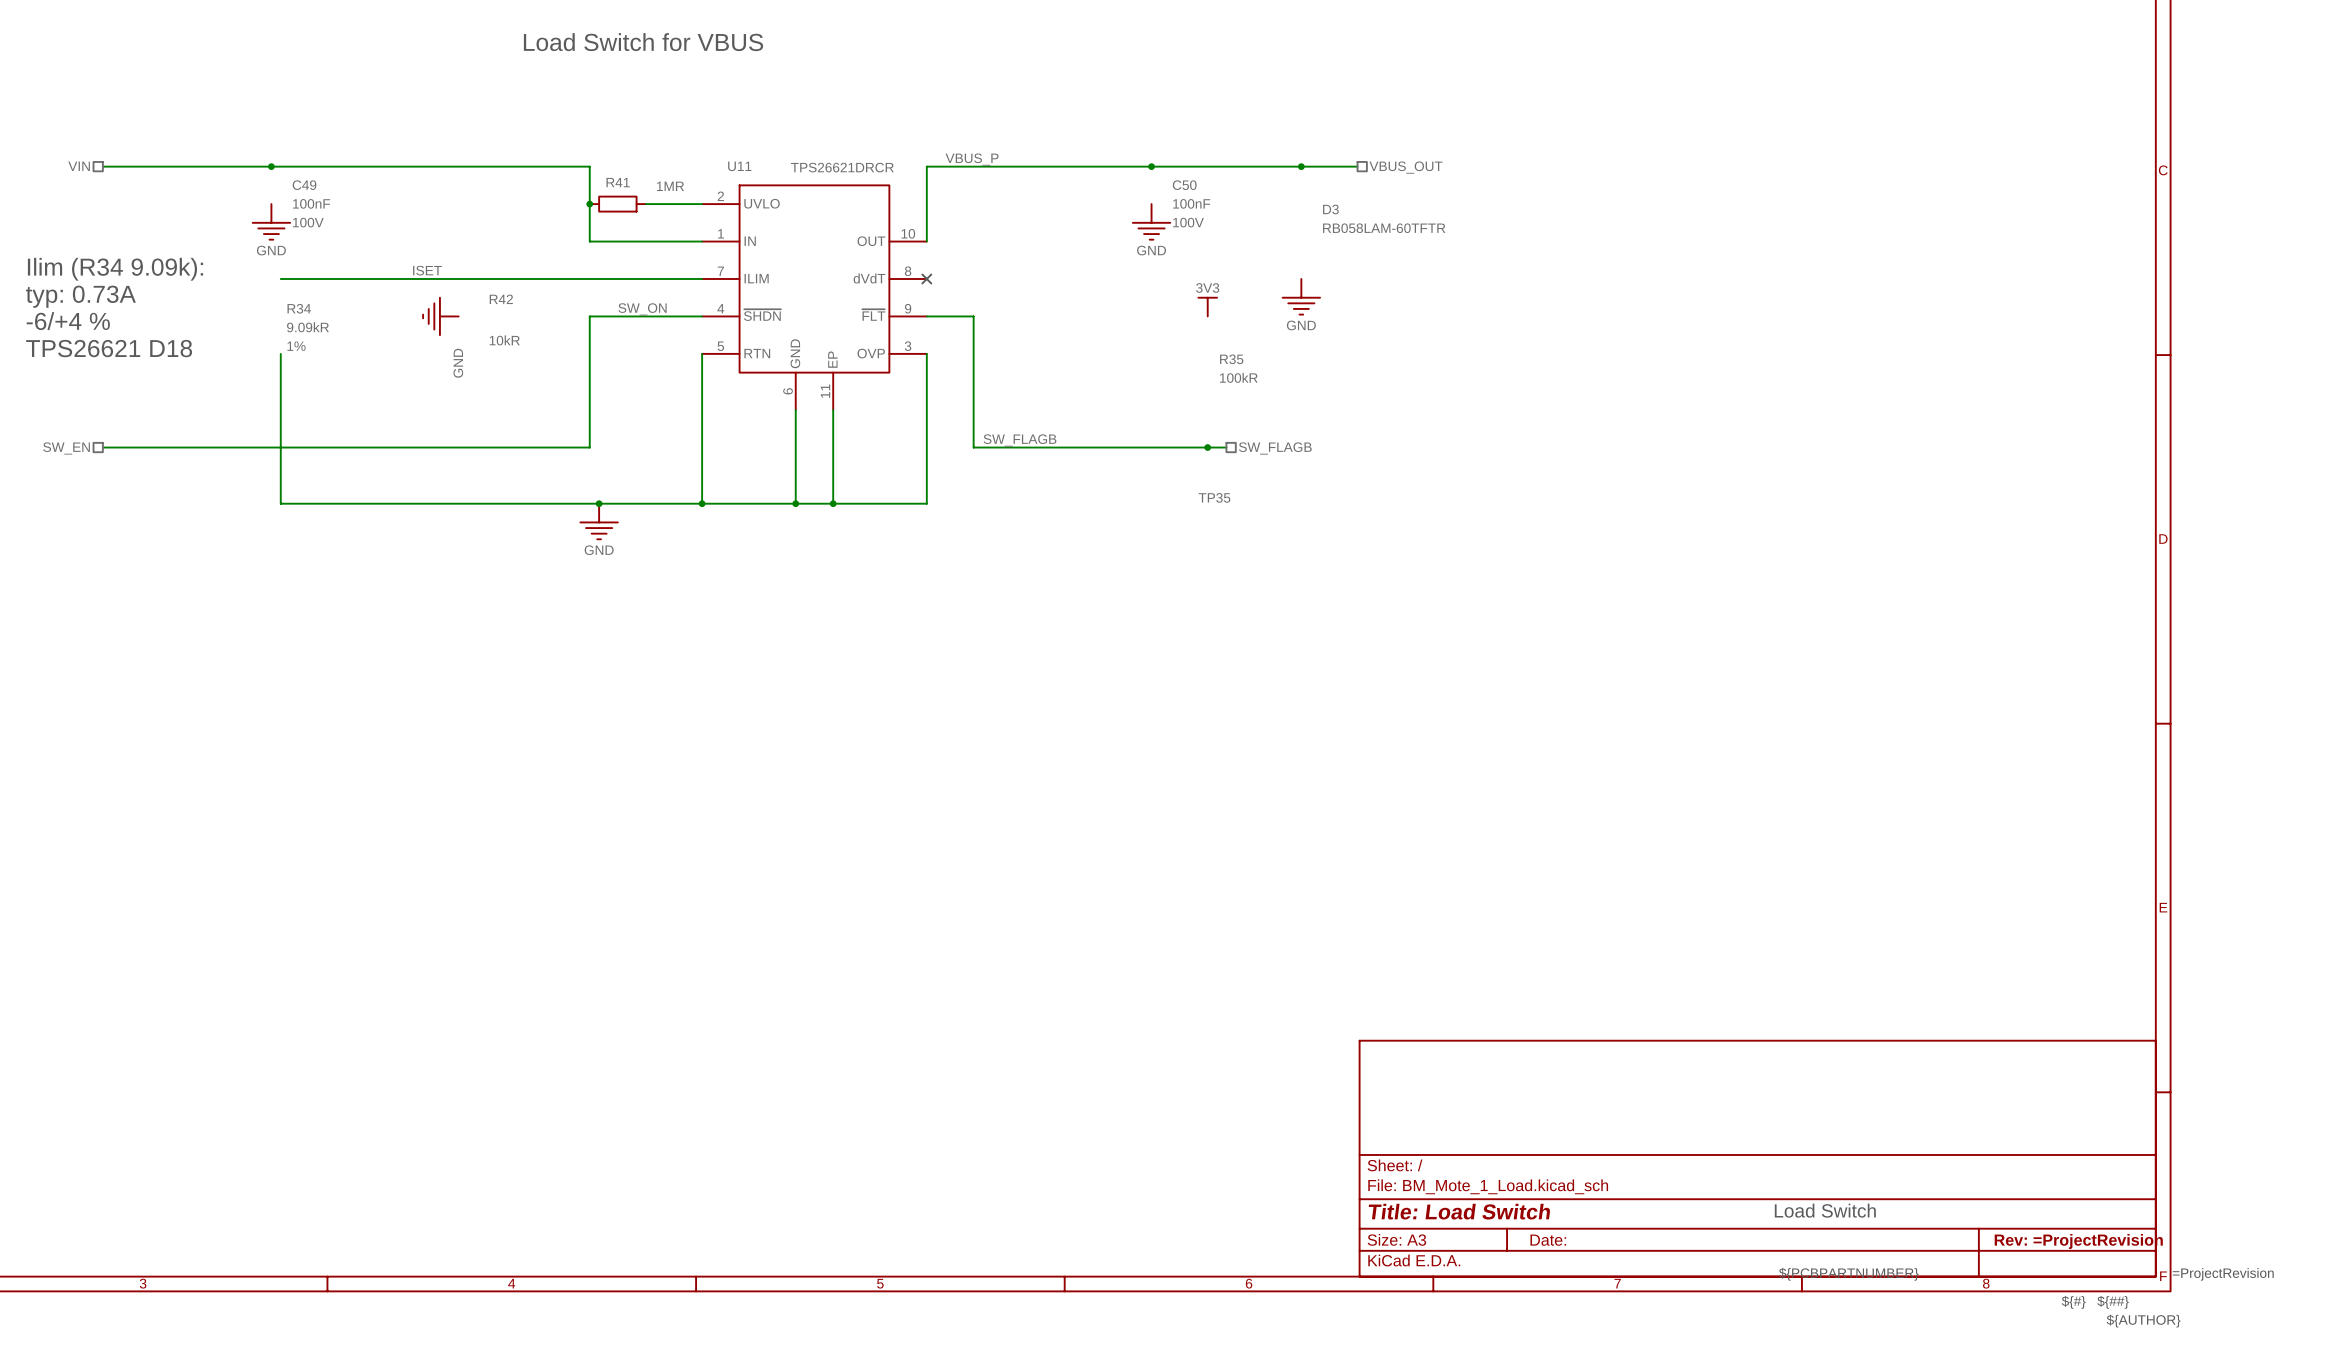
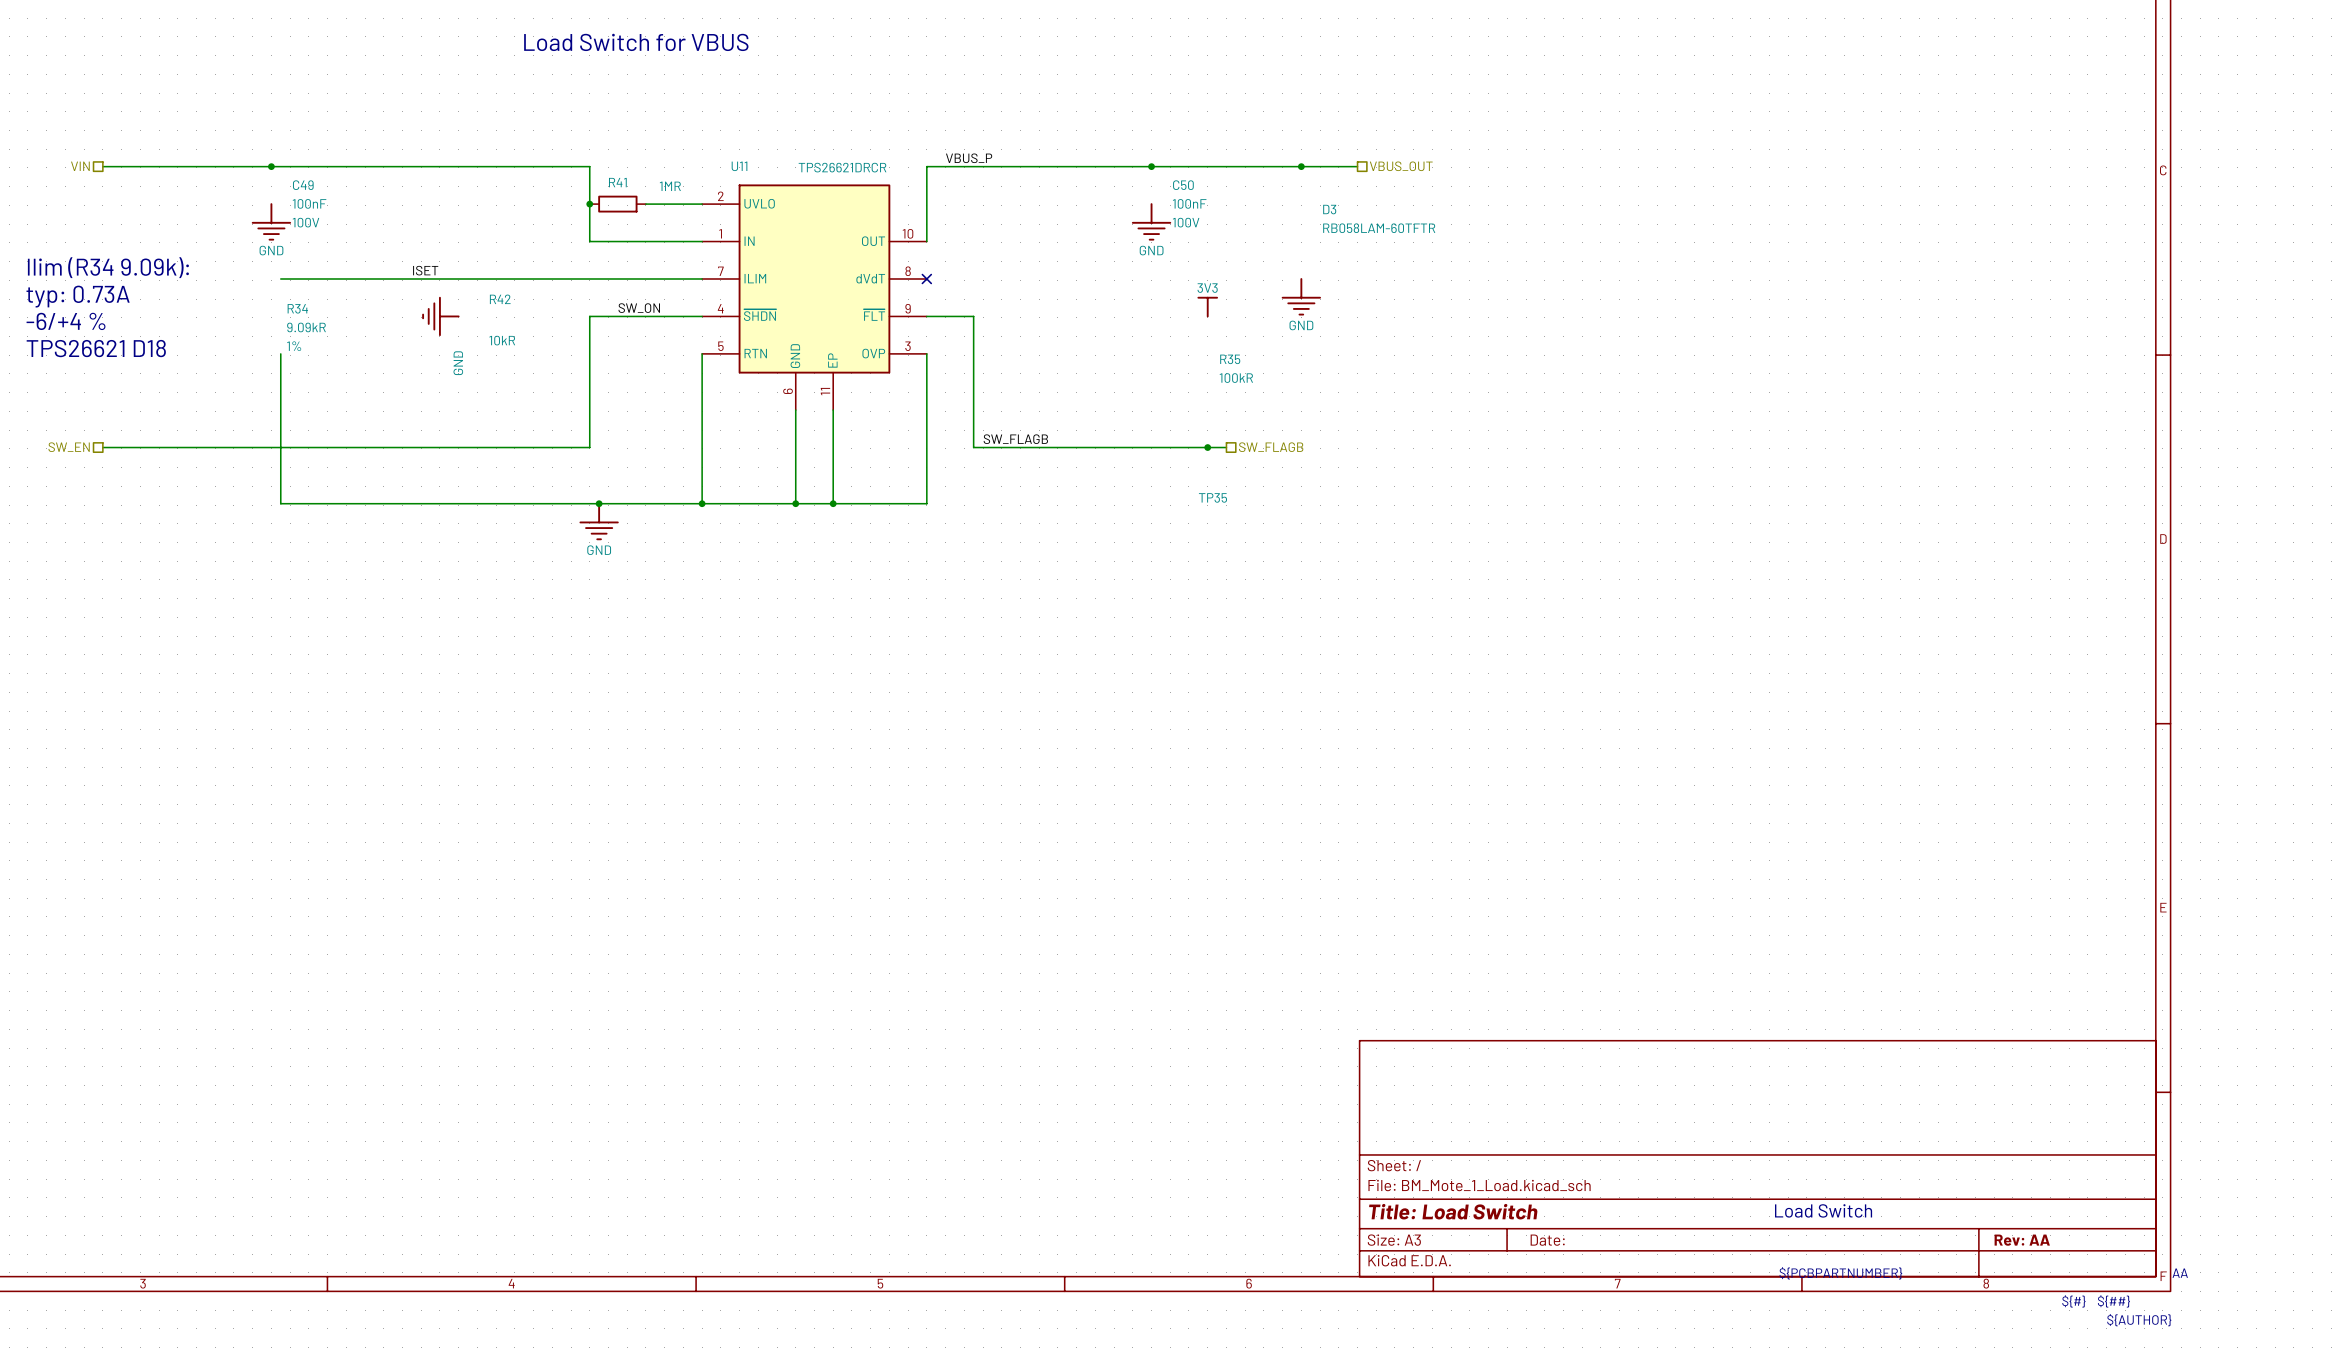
title block: Rev: =ProjectRevision (2078, 1241) -> Rev: AA (2022, 1240)
text: =ProjectRevision (2223, 1274) -> AA (2180, 1273)

